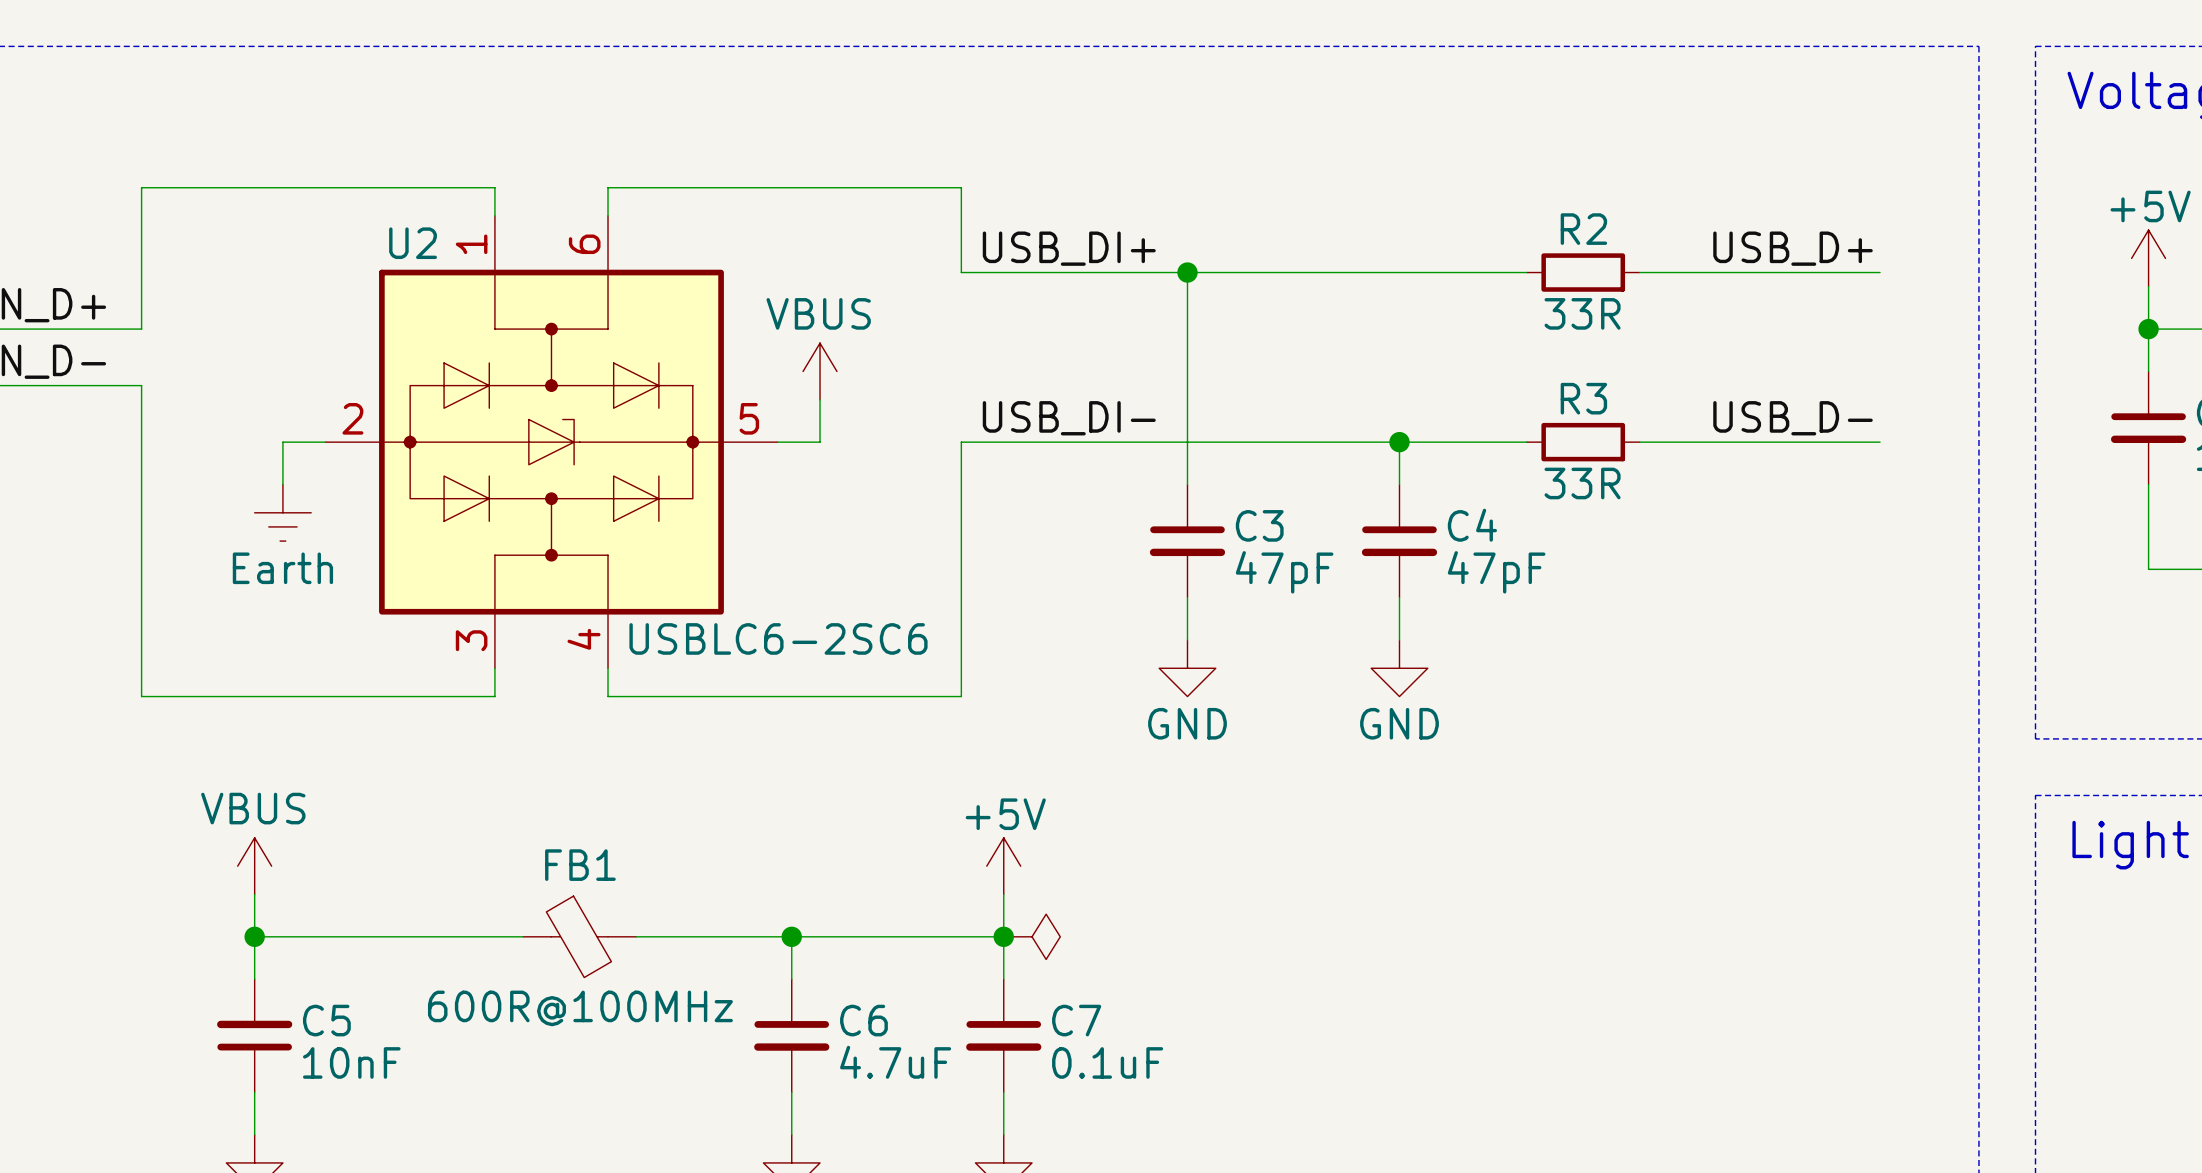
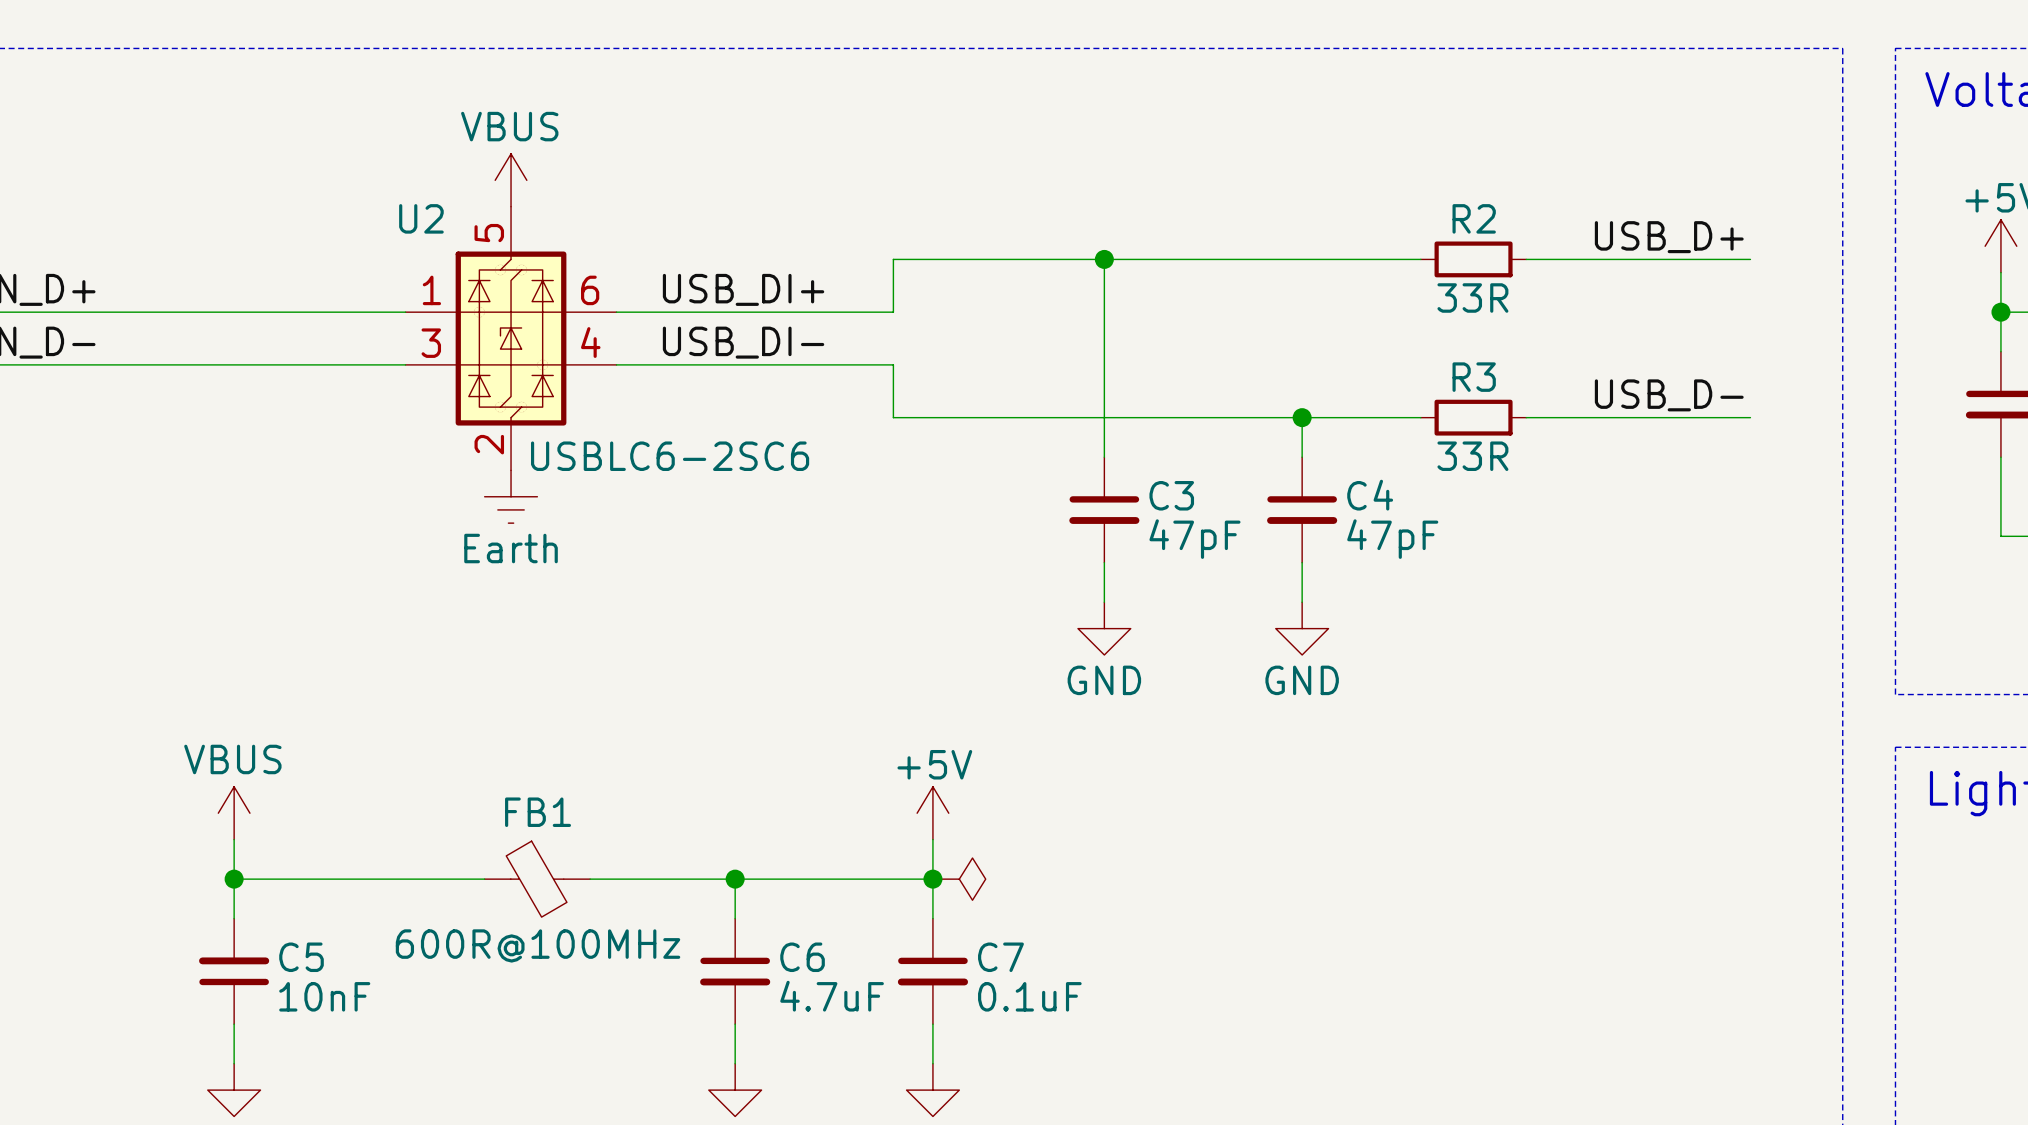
U2 symbol: [325, 216, 778, 669] -> [405, 206, 617, 471]
wire: (494, 216) (494, 187) (141, 187) (141, 329) -> (405, 312) (128, 312)
wire: (608, 216) (608, 187) (961, 187) (961, 272) -> (616, 312) (893, 312) (893, 259)
U2 name position: U2 (413, 243) -> U2 (421, 218)
label position: USB_DI+ (1069, 248) -> USB_DI+ (743, 289)
power symbol position: VBUS (820, 371) -> VBUS (511, 180)
wire: (141, 385) (141, 696) (494, 696) (494, 668) -> (128, 364) (405, 364)
wire: (820, 399) (820, 442) (777, 442) -> none
label position: USB_DI- (1069, 418) -> USB_DI- (743, 342)
wire: (325, 442) (282, 442) (282, 484) -> none
wire: (961, 442) (961, 696) (608, 696) (608, 668) -> (893, 417) (893, 364) (616, 364)
power symbol position: Earth (282, 512) -> Earth (511, 496)
U2 value position: USBLC6-2SC6 (778, 638) -> USBLC6-2SC6 (670, 456)

